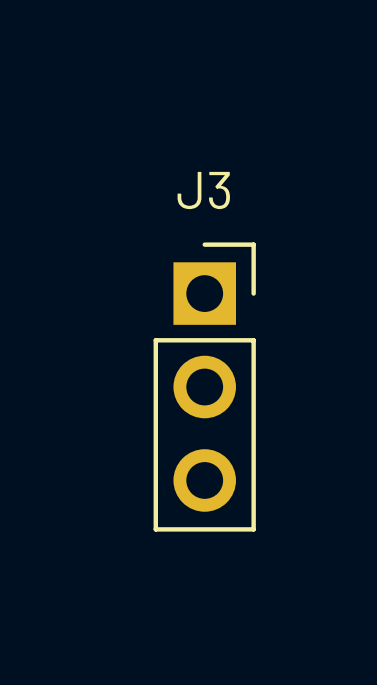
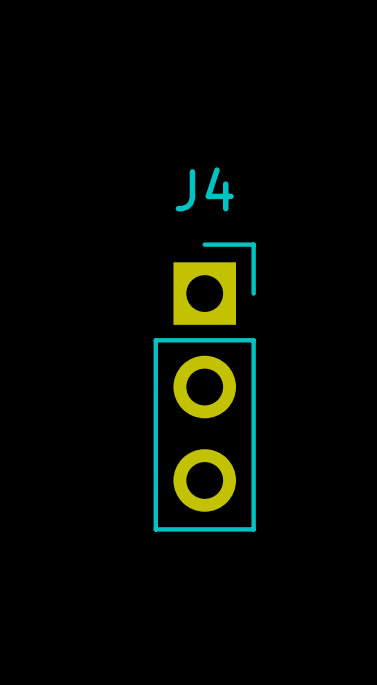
J3 name: J3 (203, 190) -> J4 (204, 189)

